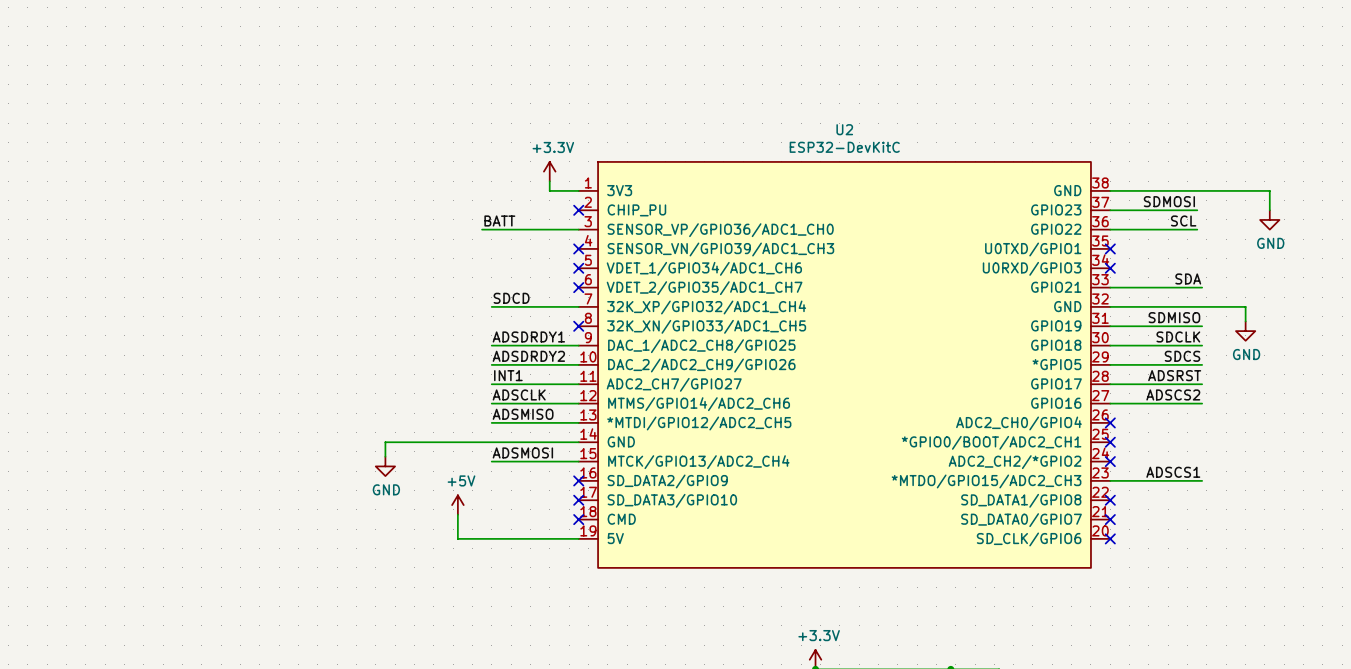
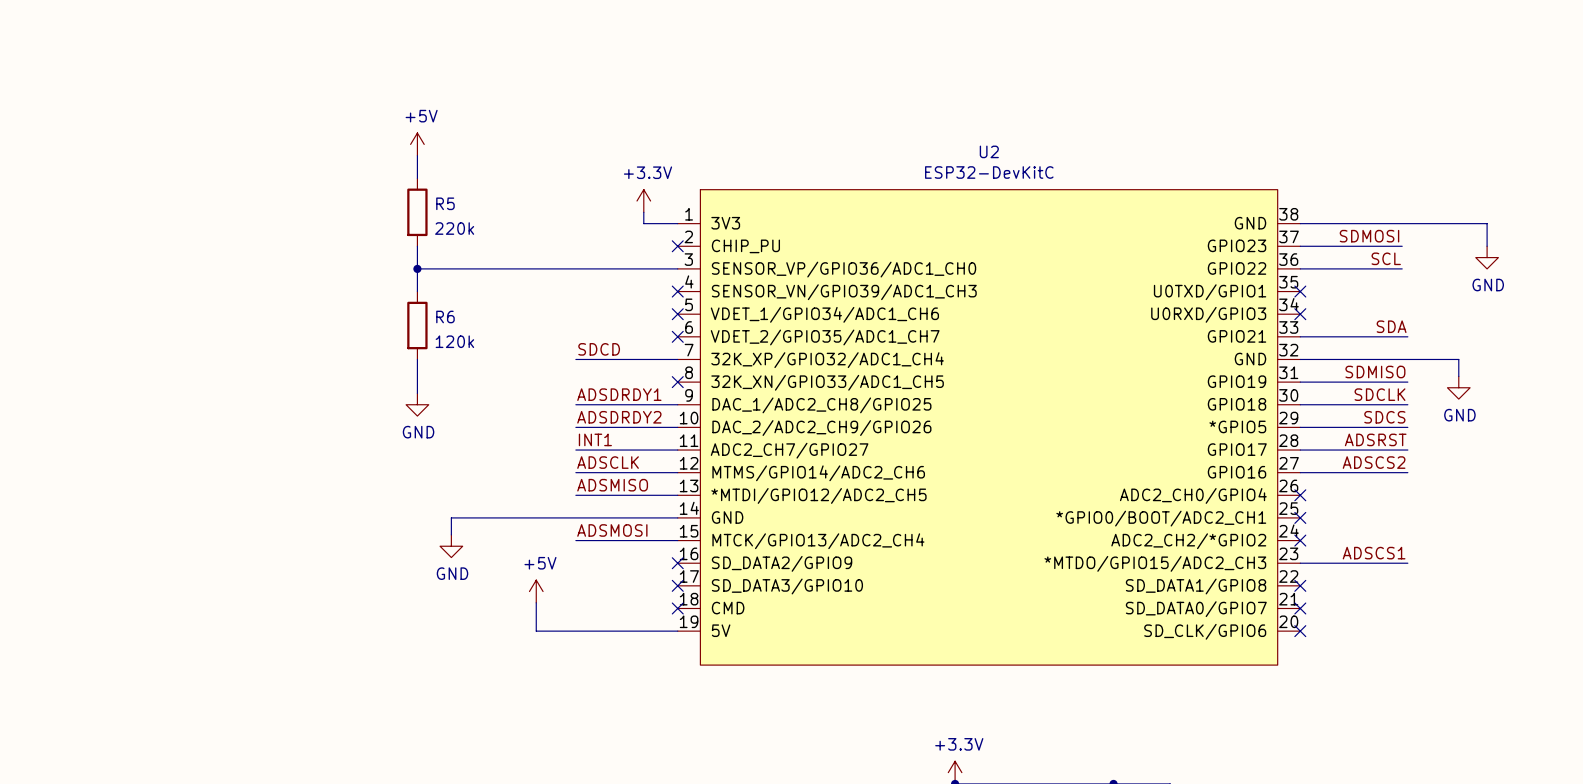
power symbol: none -> +5V (417, 144)
wire: none -> (417, 155) (417, 178)
R5: none -> 220k (417, 212)
wire: none -> (417, 246) (417, 291)
label: BATT (499, 220) -> none
wire: none -> (417, 268) (564, 268)
junction: none -> (417, 268)
R6: none -> 120k (417, 325)
wire: none -> (417, 359) (417, 393)
power symbol: none -> GND (417, 404)

